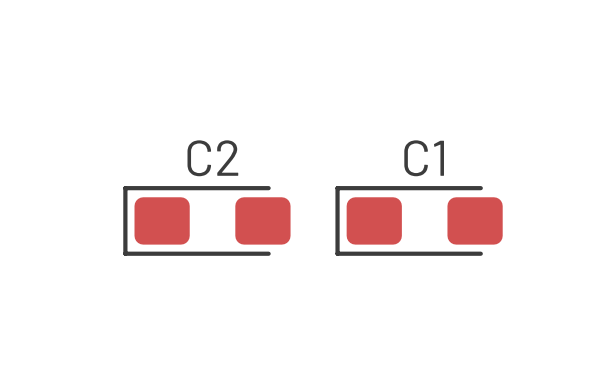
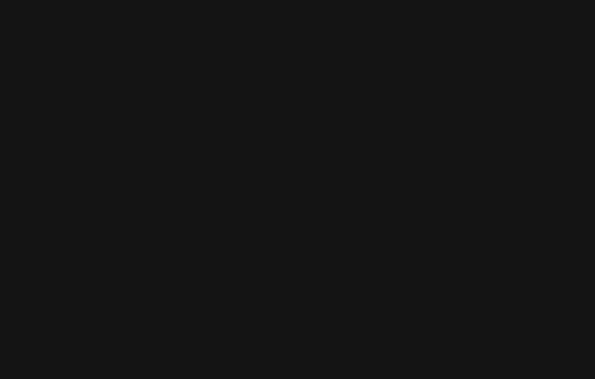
C2: (206, 220) -> none
C1: (419, 220) -> none

